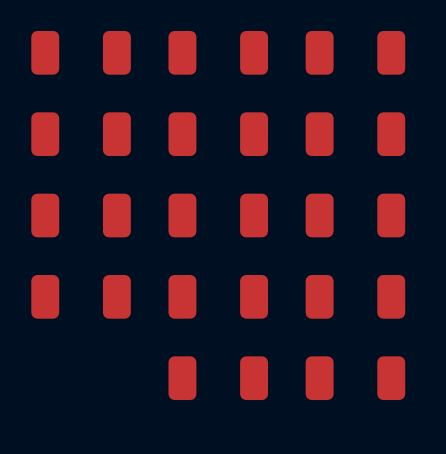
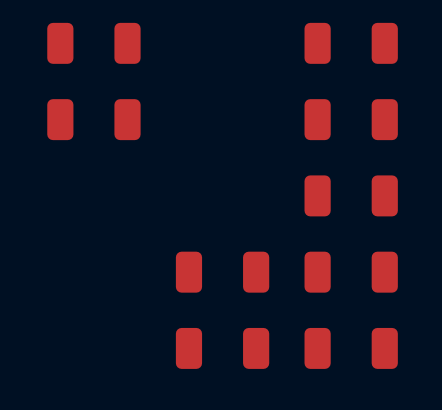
part: (218, 52) -> none
part: (218, 134) -> none
part: (81, 215) -> none
part: (218, 215) -> none
part: (81, 296) -> none

